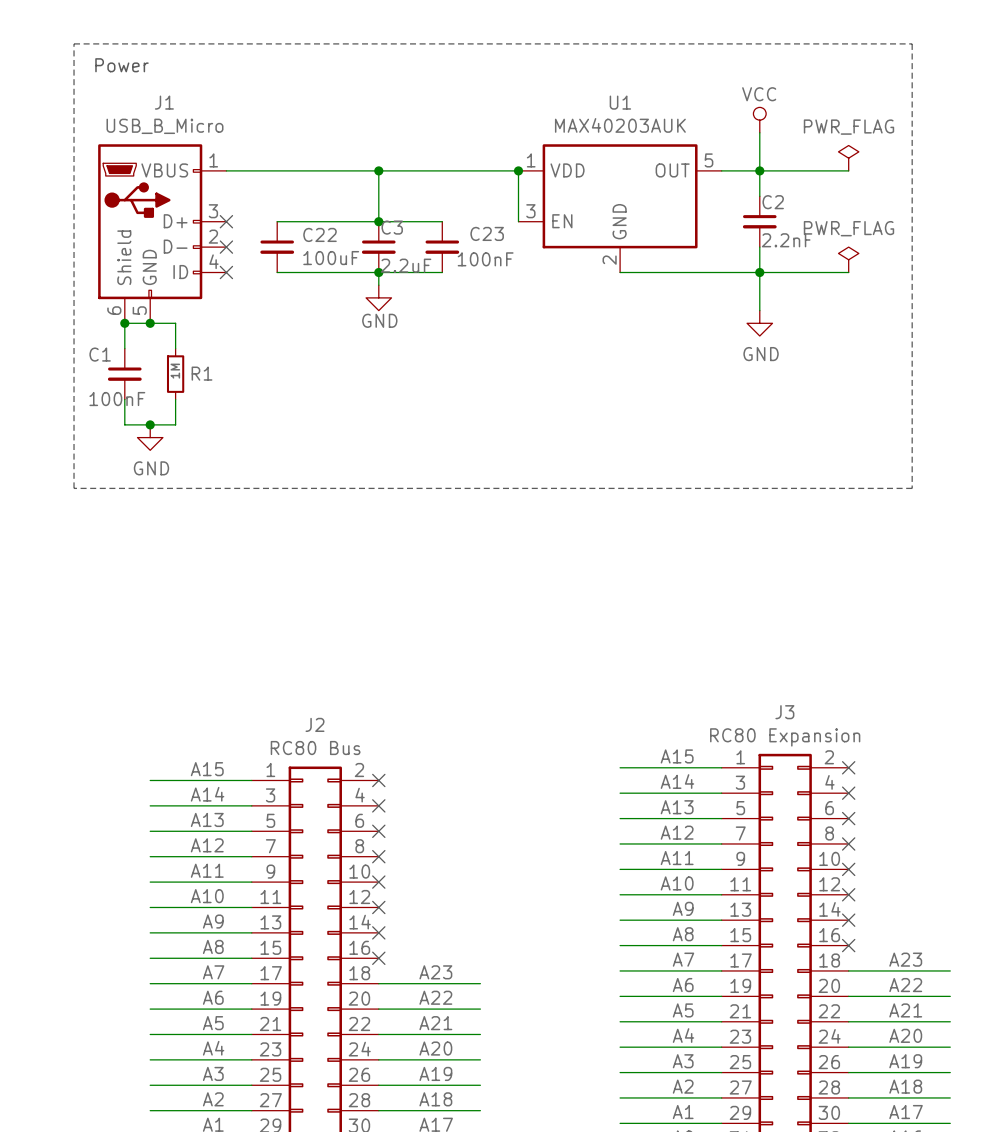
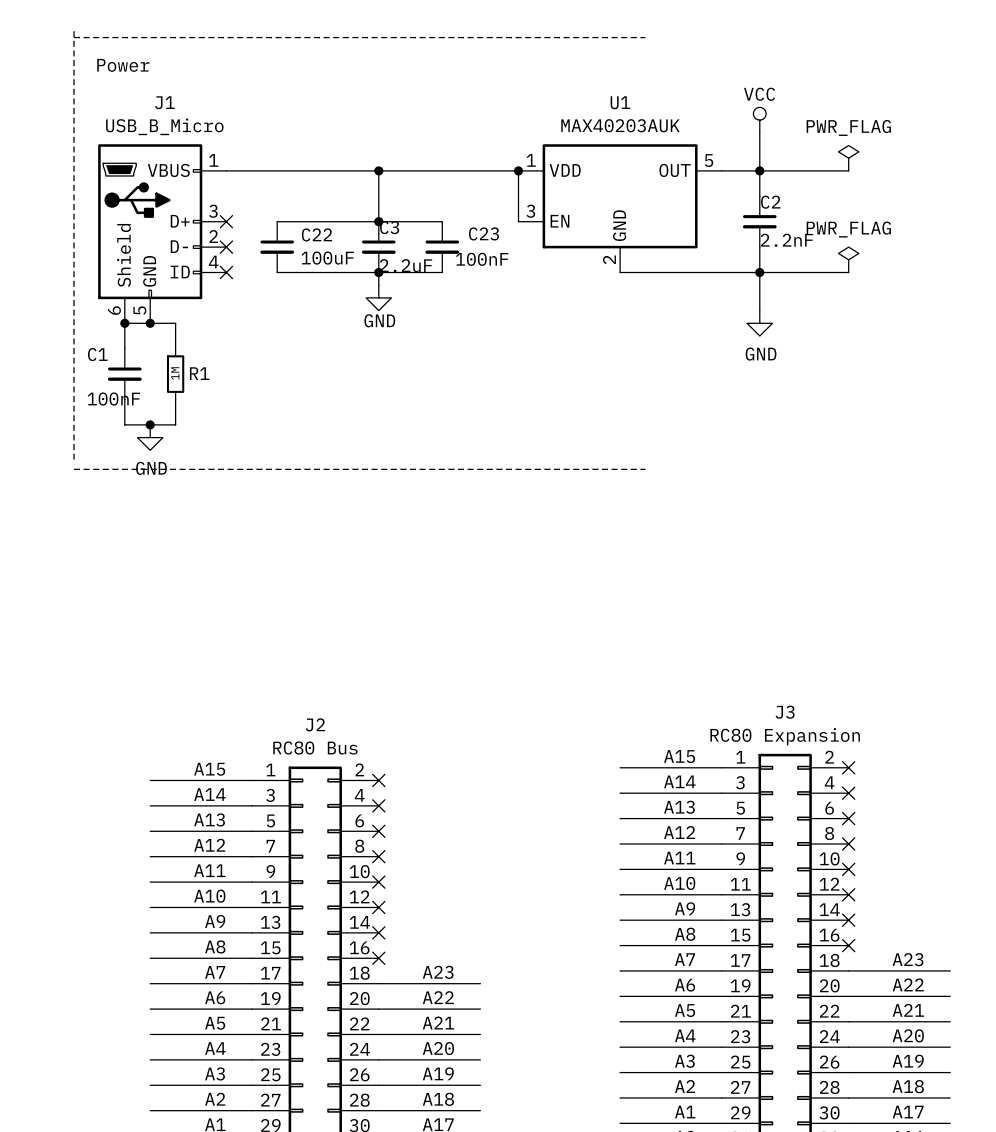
line: none -> (74, 37) (645, 37)
line: (74, 43) (912, 43) (912, 488) (74, 488) (74, 463) -> (74, 43) (74, 31)
line: none -> (74, 469) (645, 469)

